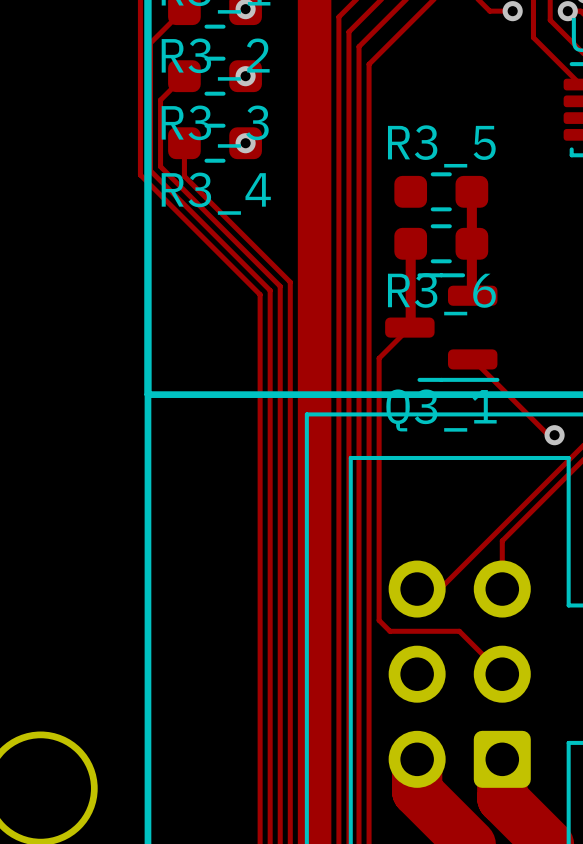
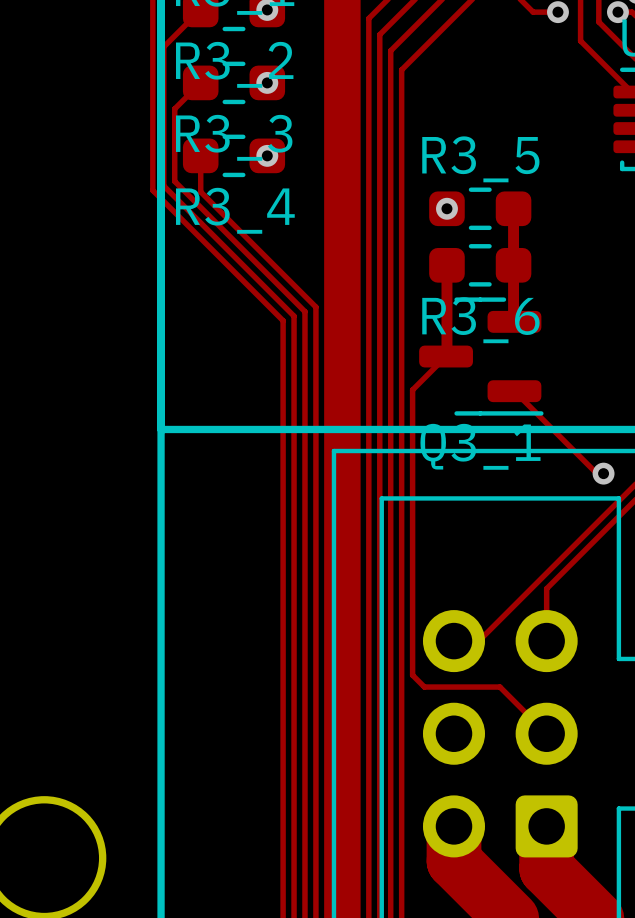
via: none -> (446, 208)

